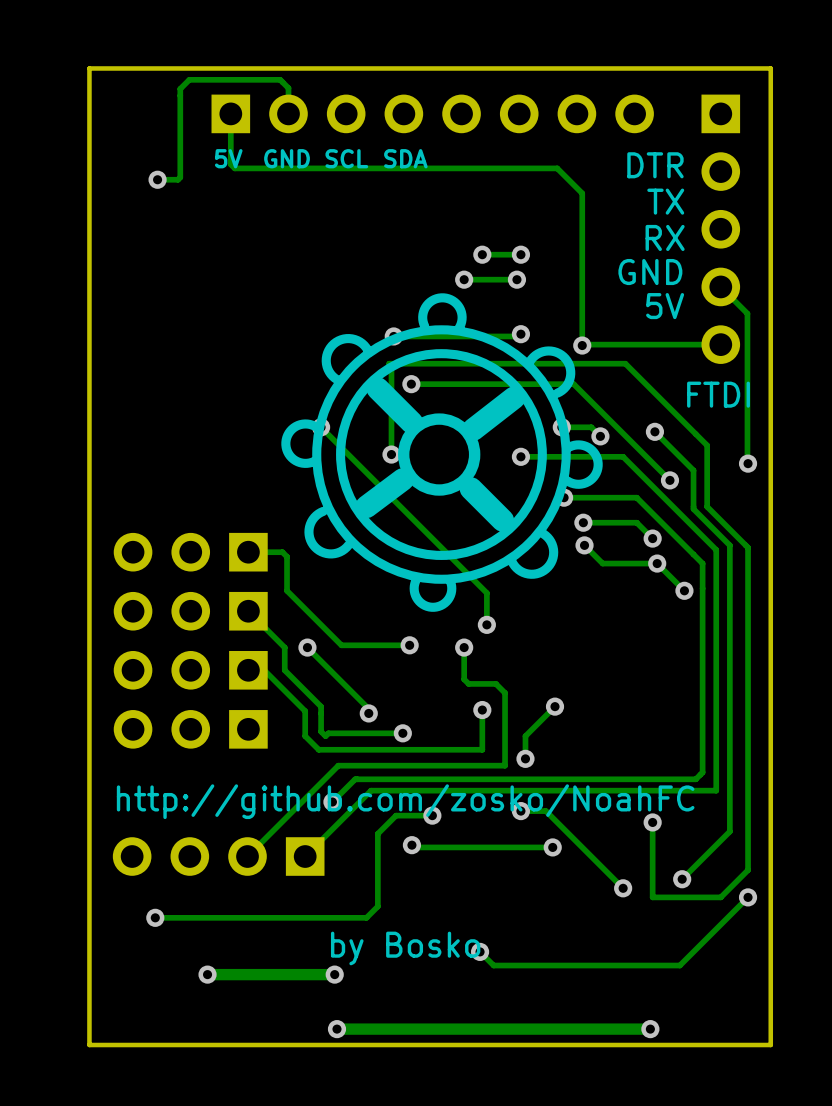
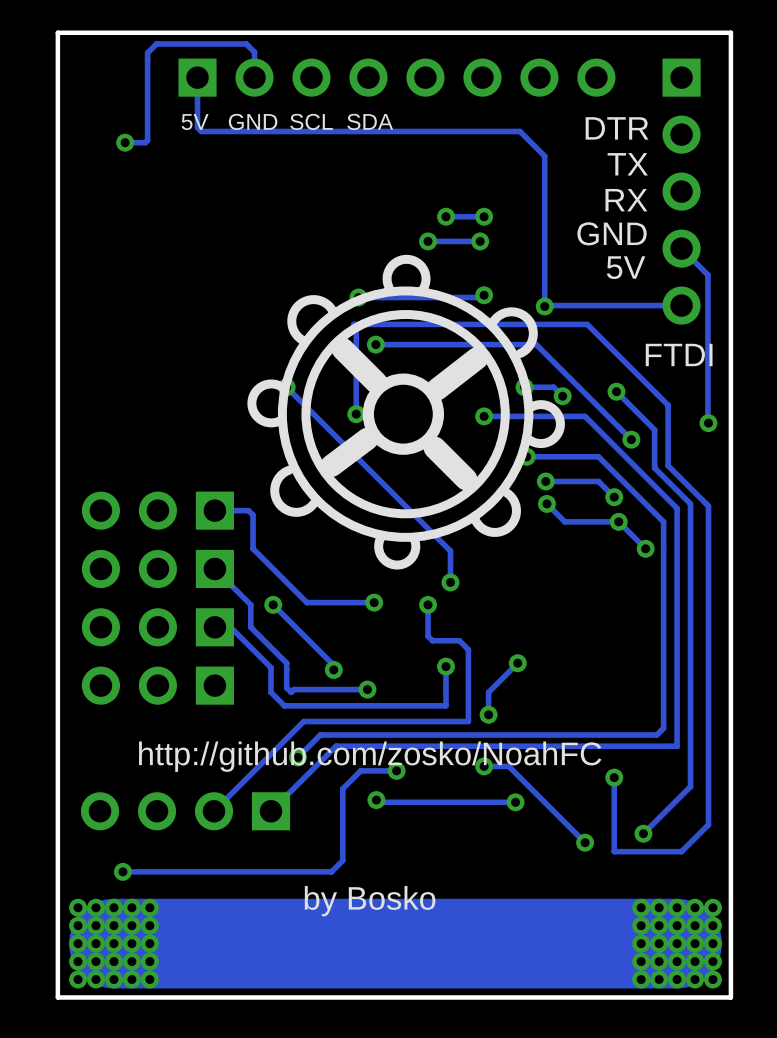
track: (748, 897) (679, 965) (493, 965) (480, 951) -> none
via: (748, 897) -> none
via: (480, 951) -> none
via: none -> (78, 907)
via: none -> (96, 907)
via: none -> (113, 907)
via: none -> (131, 907)
via: none -> (149, 907)
via: none -> (641, 907)
via: none -> (659, 907)
via: none -> (677, 907)
via: none -> (695, 907)
via: none -> (712, 907)
via: none -> (78, 925)
via: none -> (96, 925)
via: none -> (113, 925)
via: none -> (131, 925)
via: none -> (149, 925)
via: none -> (641, 925)
via: none -> (659, 925)
via: none -> (677, 925)
via: none -> (695, 925)
via: none -> (712, 925)
via: (207, 974) -> none
track: (334, 974) (207, 974) -> none
via: (334, 974) -> none
via: none -> (78, 943)
via: none -> (96, 943)
via: none -> (113, 943)
via: none -> (131, 943)
via: none -> (149, 943)
via: none -> (641, 943)
via: none -> (659, 943)
track: none -> (677, 943) (113, 943)
via: none -> (677, 943)
via: none -> (695, 943)
via: none -> (712, 943)
via: none -> (78, 961)
via: none -> (96, 961)
via: none -> (113, 961)
via: none -> (131, 961)
via: none -> (149, 961)
via: none -> (641, 961)
via: none -> (659, 961)
via: none -> (677, 961)
via: none -> (695, 961)
via: none -> (712, 961)
via: none -> (78, 979)
via: none -> (96, 979)
via: none -> (113, 979)
via: none -> (131, 979)
via: none -> (149, 979)
via: none -> (641, 979)
via: none -> (659, 979)
via: none -> (677, 979)
via: none -> (695, 979)
via: none -> (712, 979)
via: (336, 1029) -> none
track: (650, 1029) (336, 1029) -> none
via: (650, 1029) -> none

